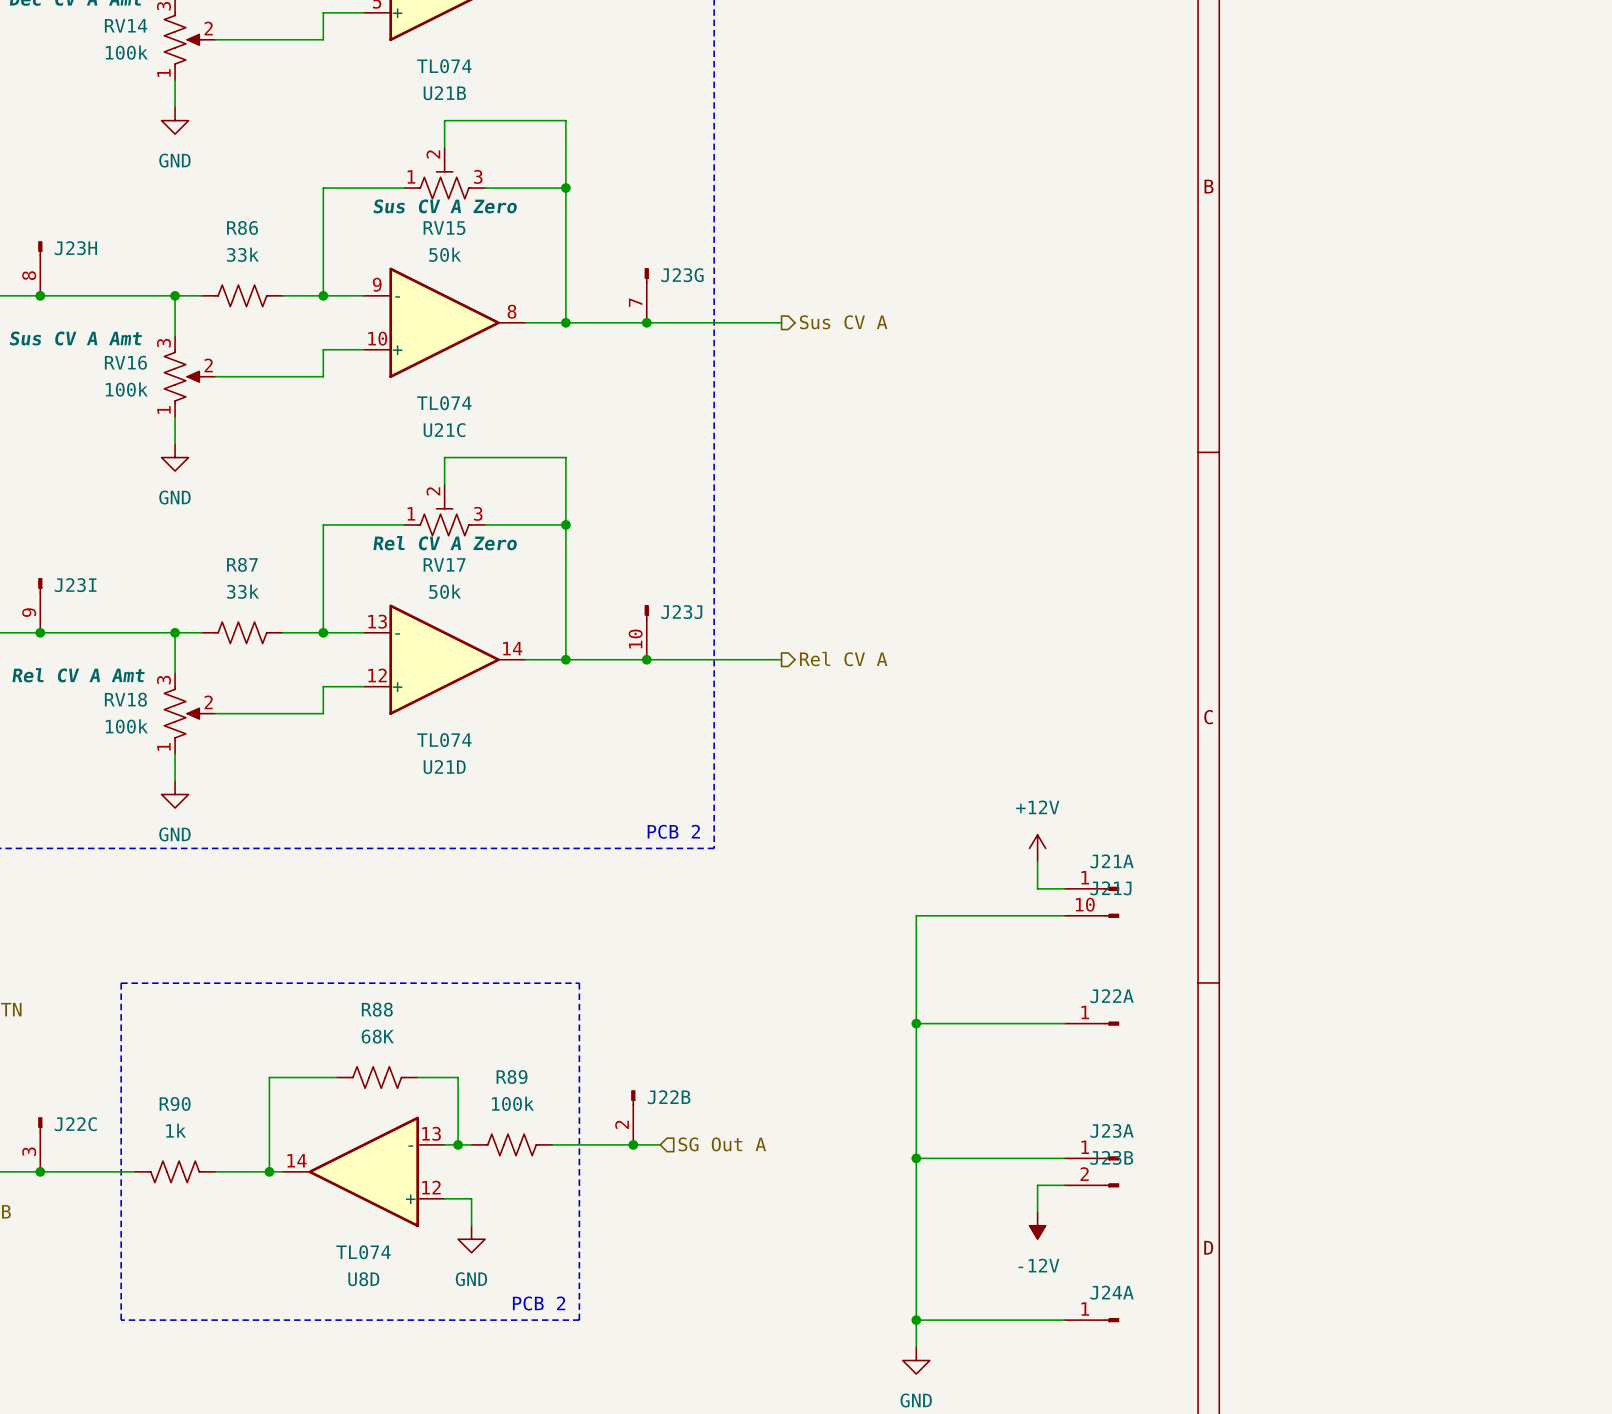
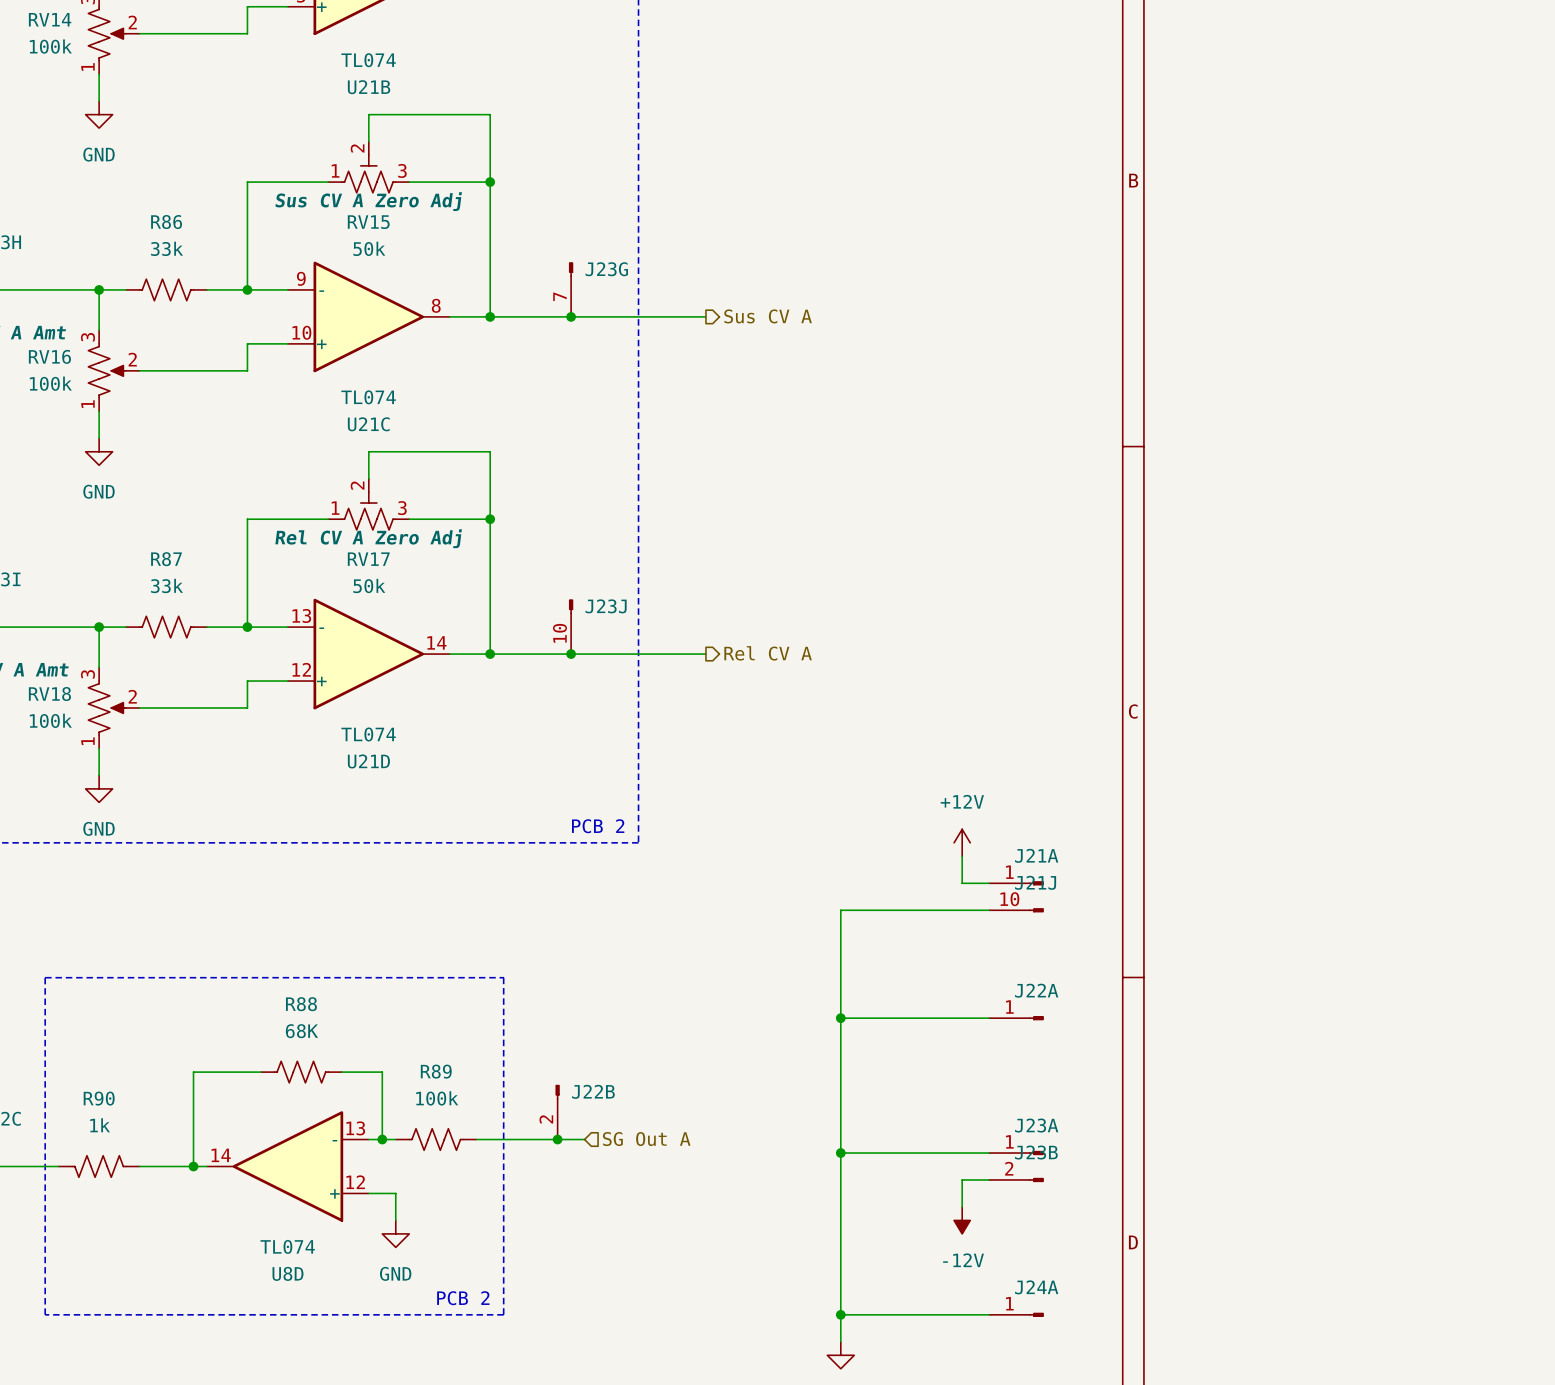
RV15 text: Sus CV A Zero (445, 206) -> Sus CV A Zero Adj (368, 201)
RV17 text: Rel CV A Zero (445, 543) -> Rel CV A Zero Adj (368, 538)

